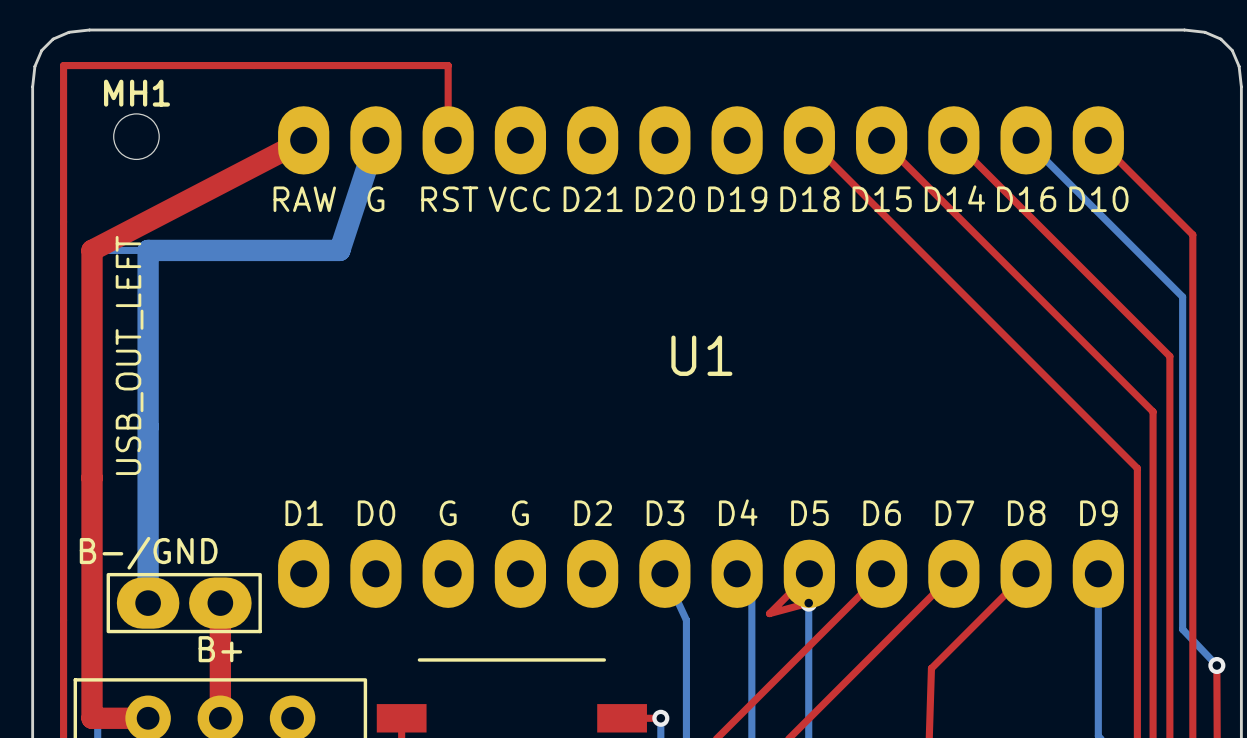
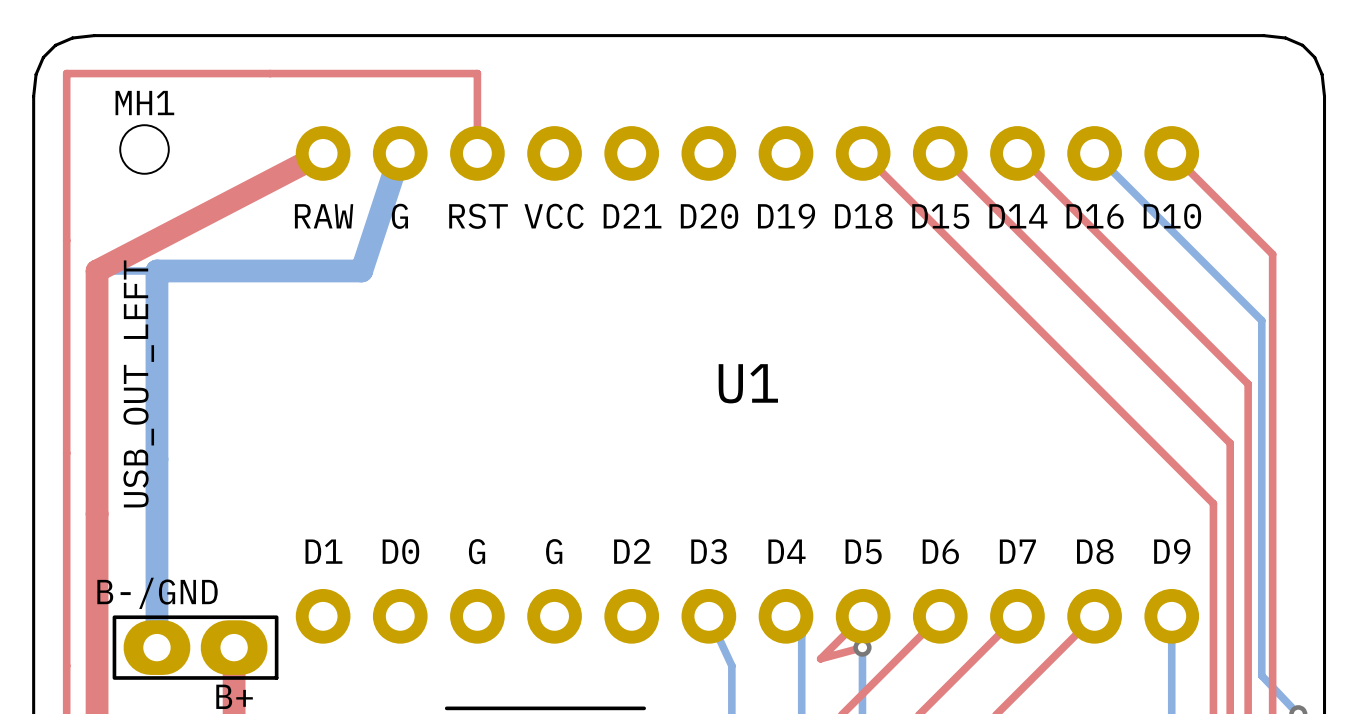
U1 footprint: [278, 106, 1124, 608] -> [295, 126, 1200, 644]

